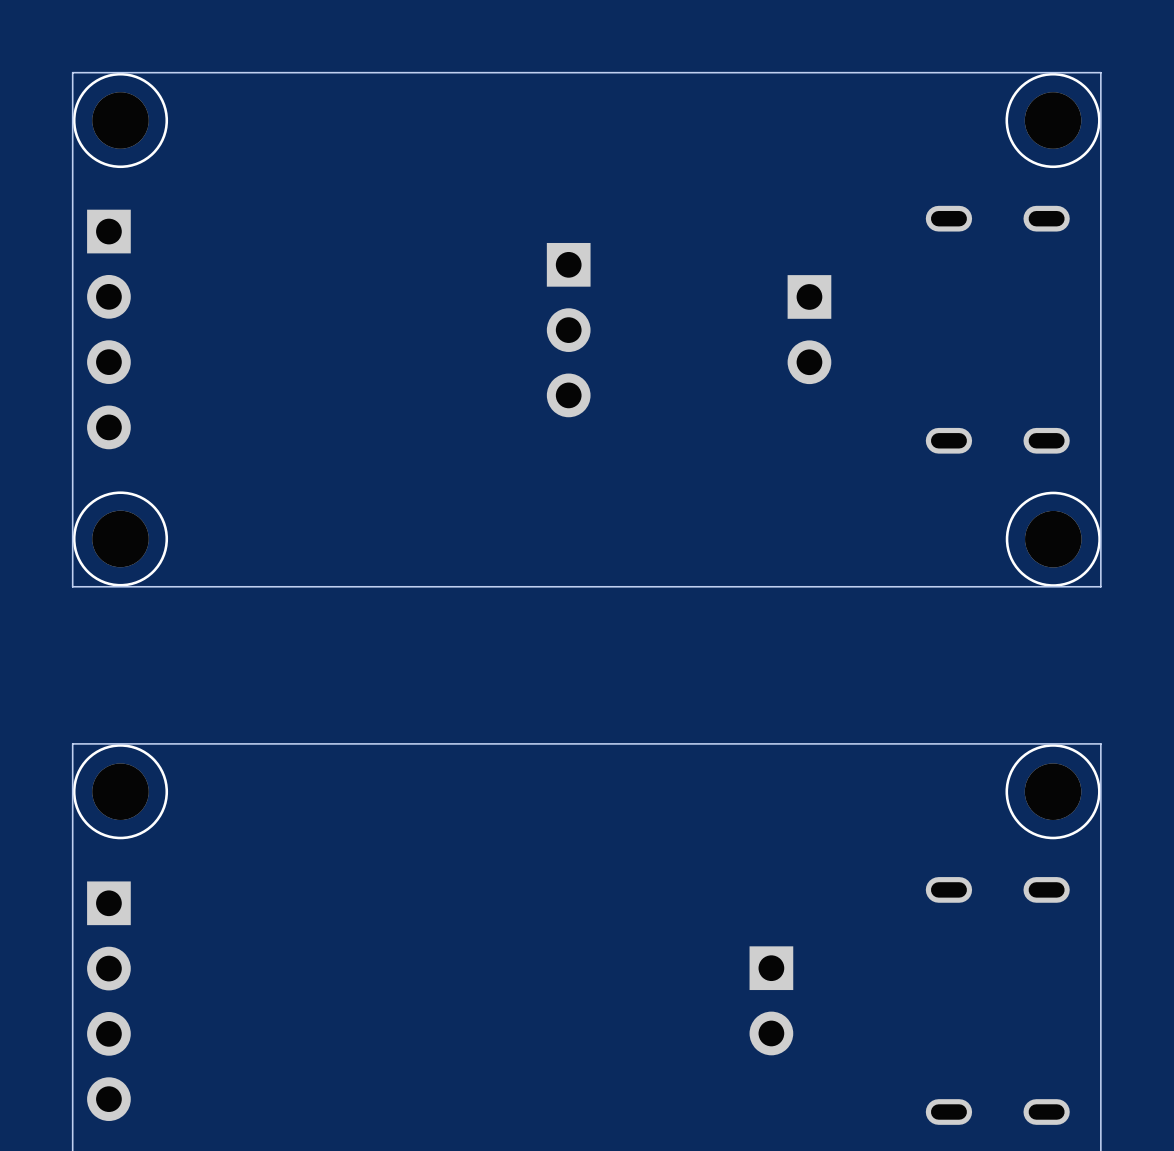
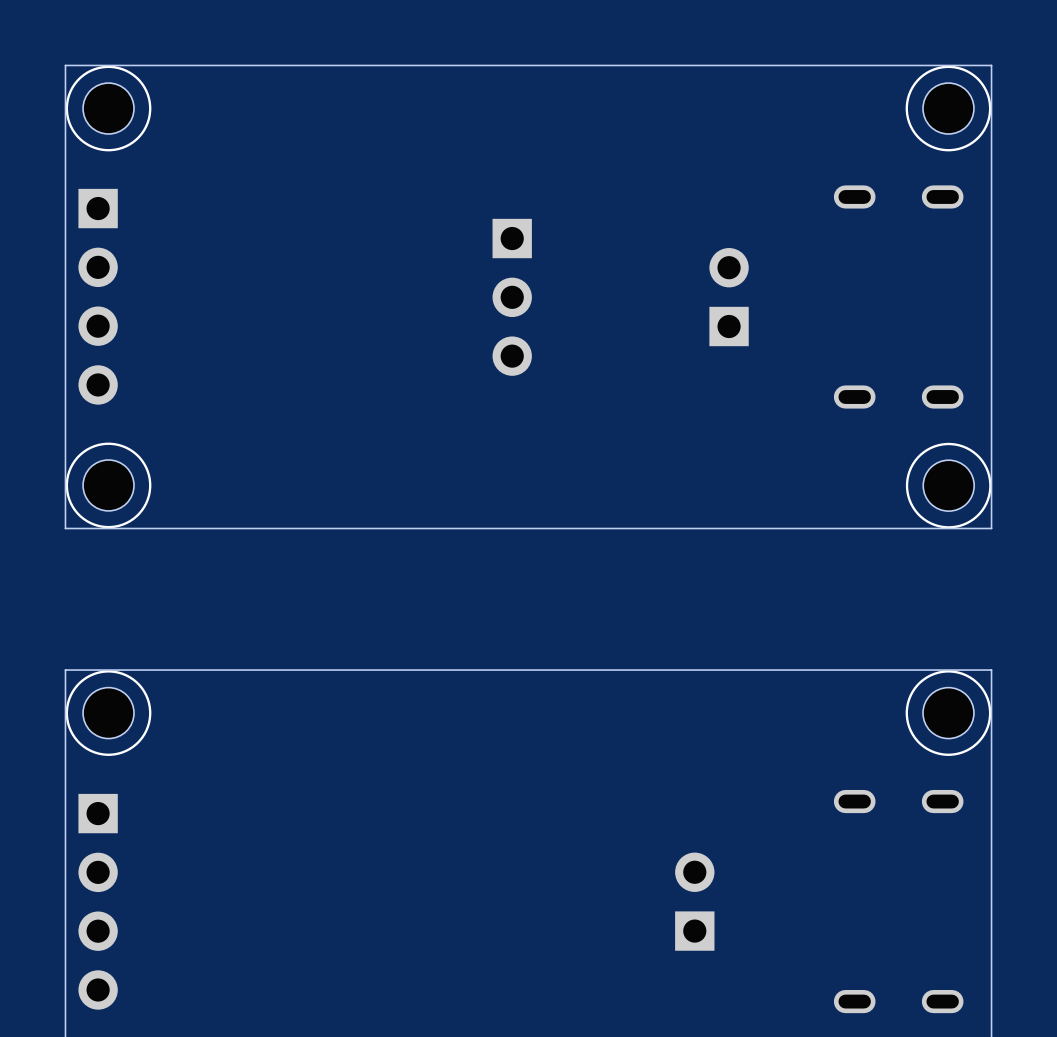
part footprint: [72, 72, 169, 169] -> [65, 65, 152, 152]
part footprint: [1005, 72, 1101, 169] -> [905, 65, 992, 152]
part rotation: 0° (809, 329) -> 180° (729, 297)
part footprint: [72, 491, 169, 587] -> [65, 442, 152, 529]
part footprint: [1005, 491, 1101, 587] -> [905, 442, 992, 529]
part footprint: [72, 744, 169, 840] -> [65, 670, 152, 756]
part footprint: [1005, 744, 1101, 840] -> [905, 670, 992, 756]
part rotation: 0° (771, 1000) -> 180° (694, 901)

